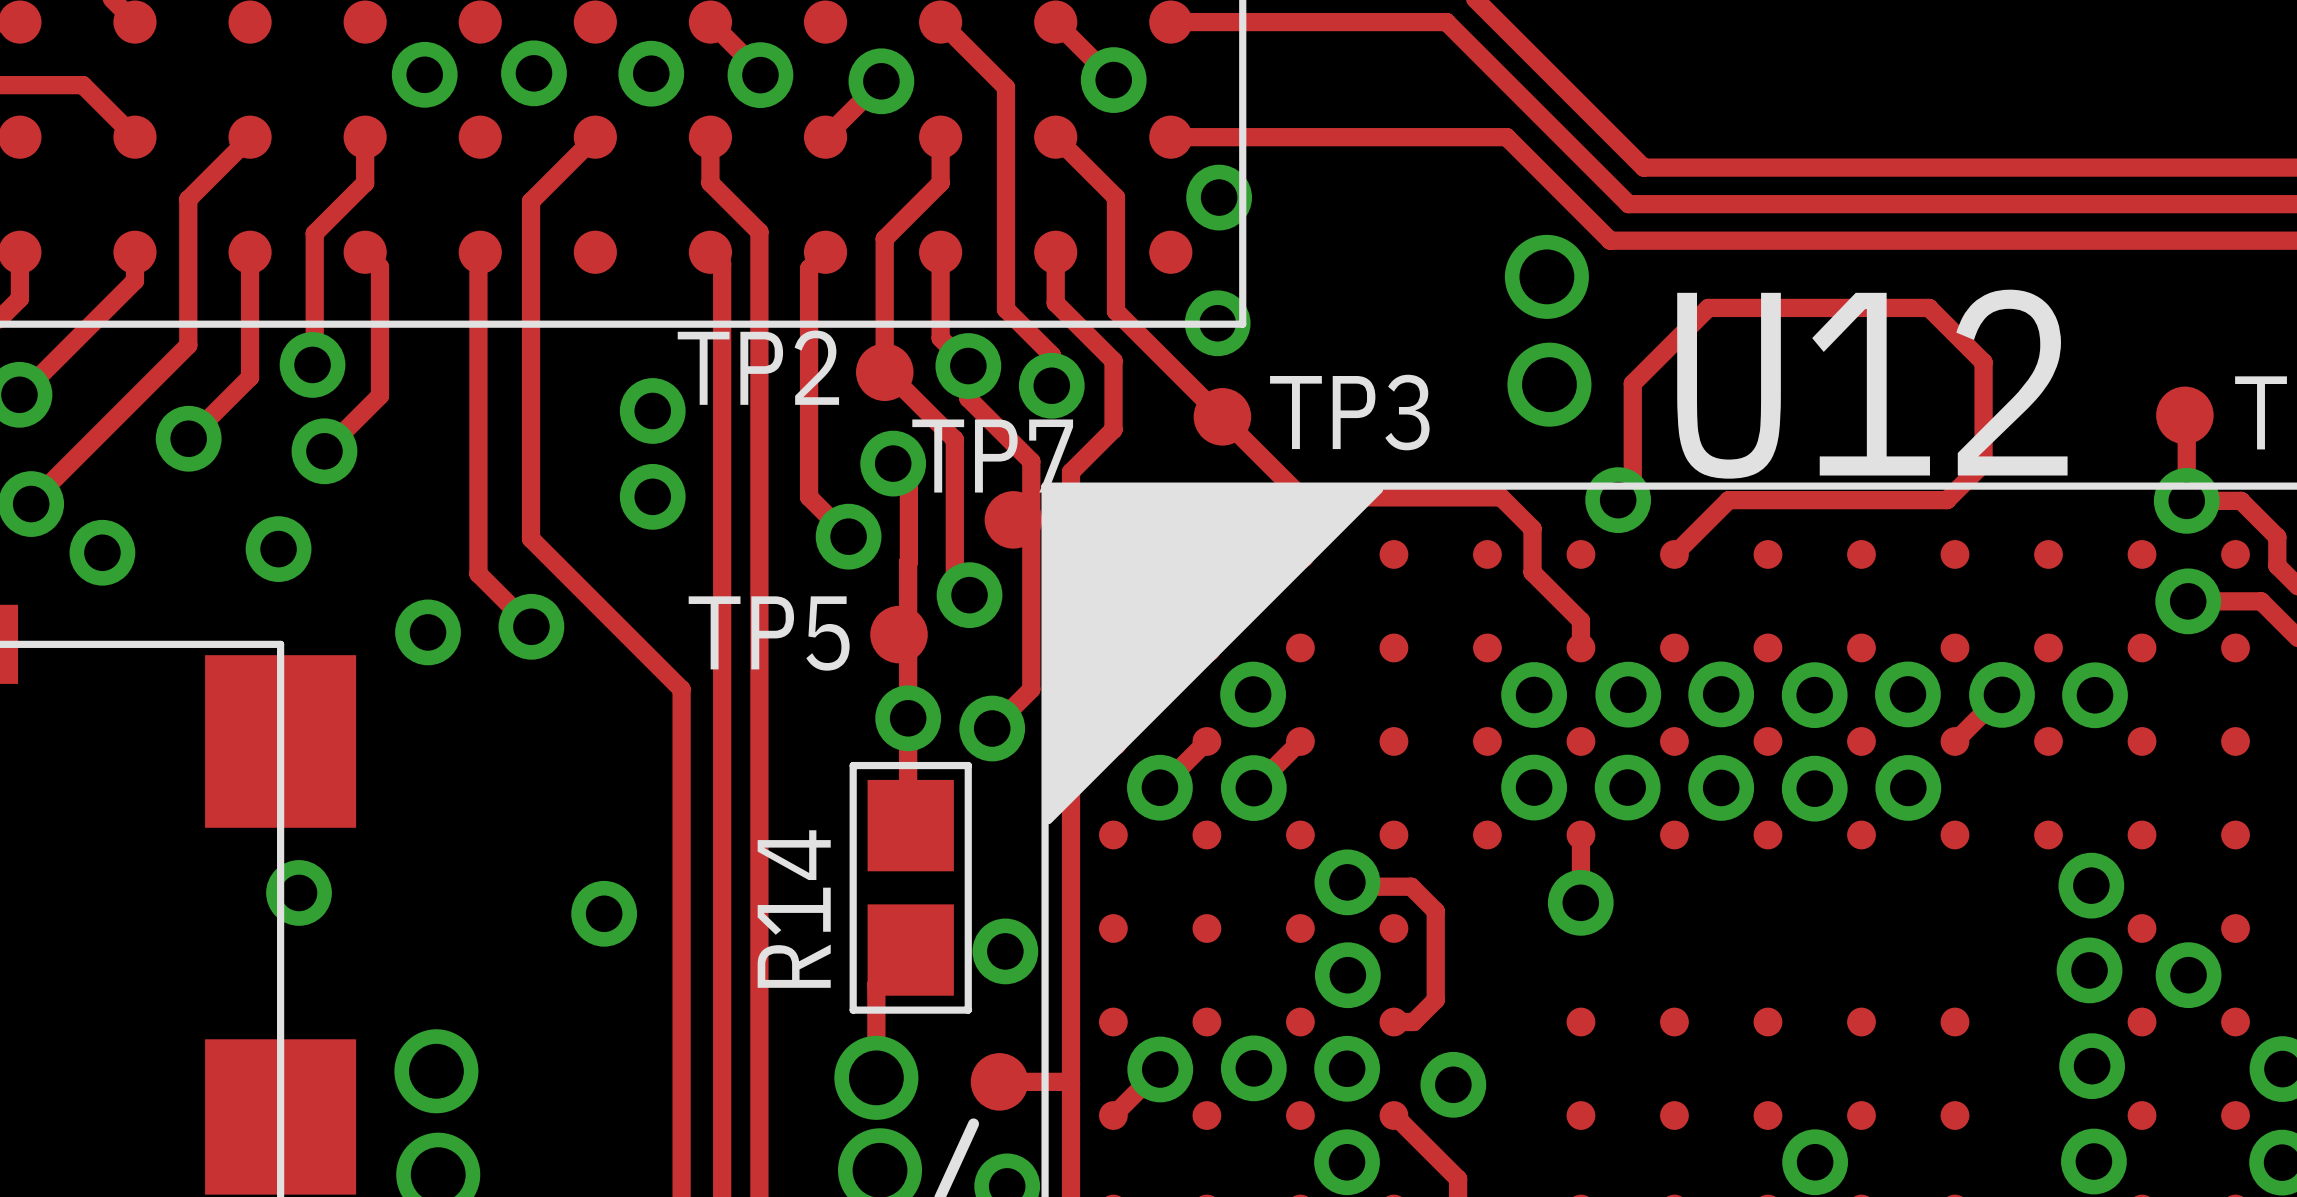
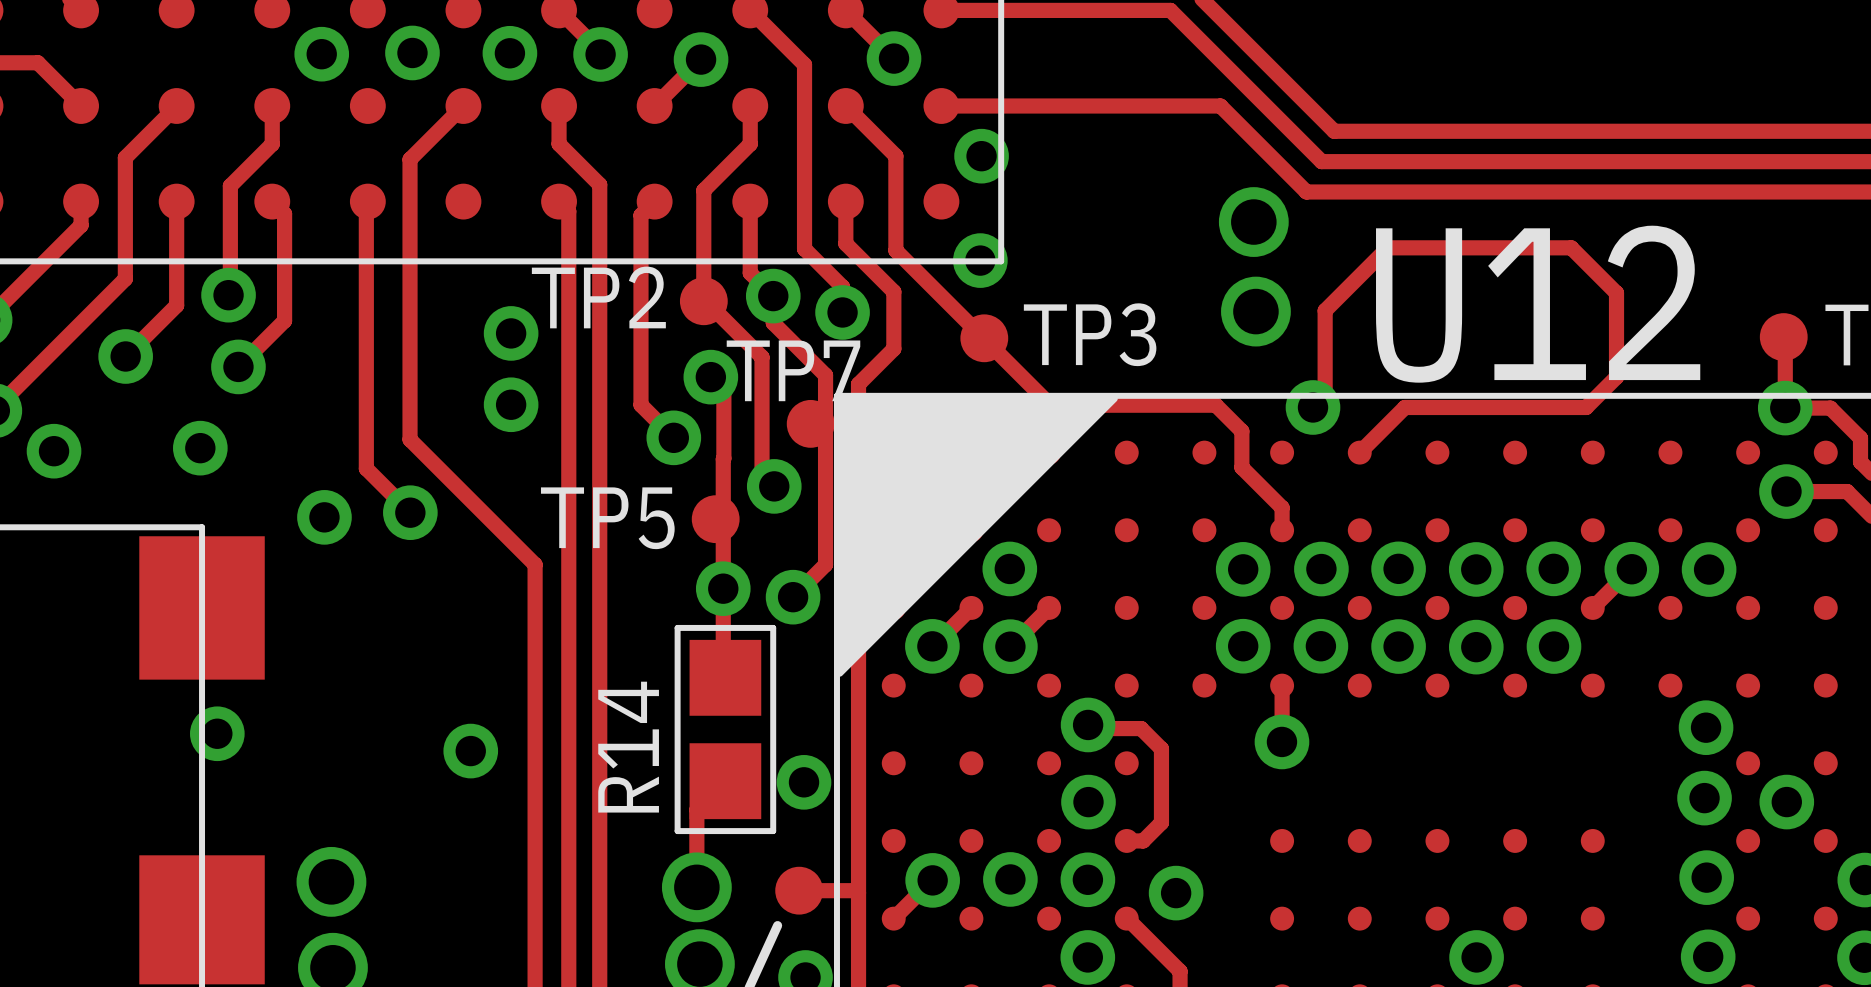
U12 name position: U12 (1872, 384) -> U12 (1538, 304)

